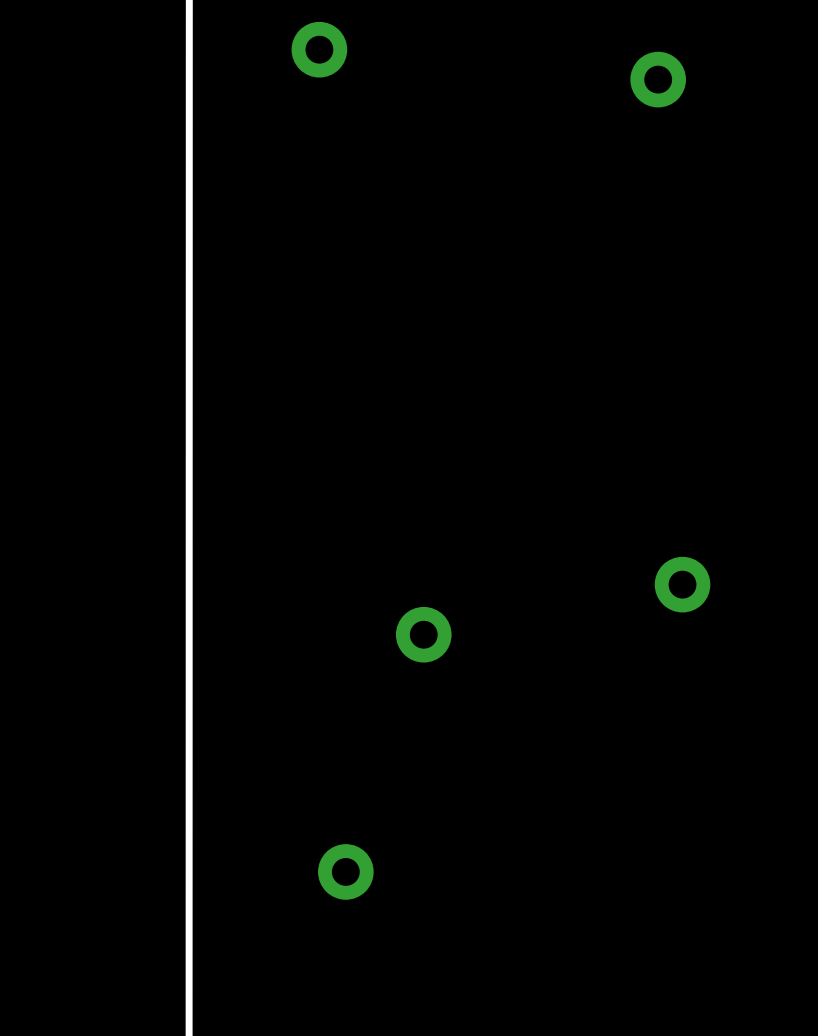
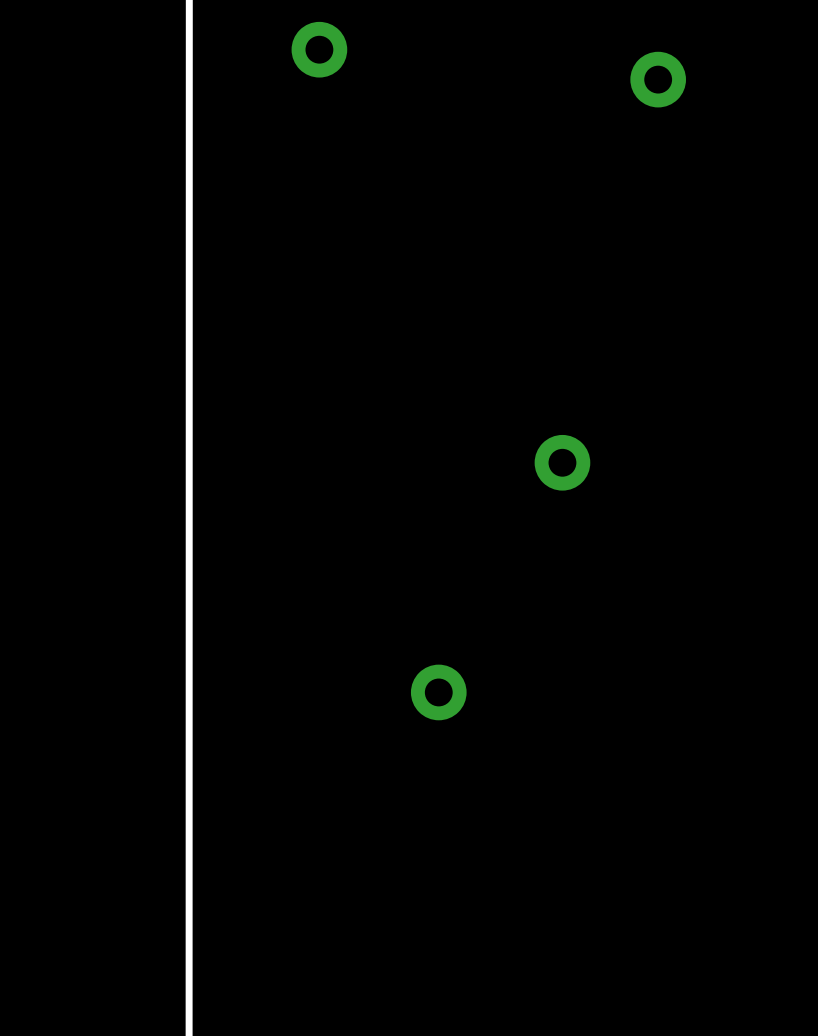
via: none -> (562, 462)
via: (682, 584) -> none
via position: (423, 634) -> (438, 692)
via: (345, 871) -> none

